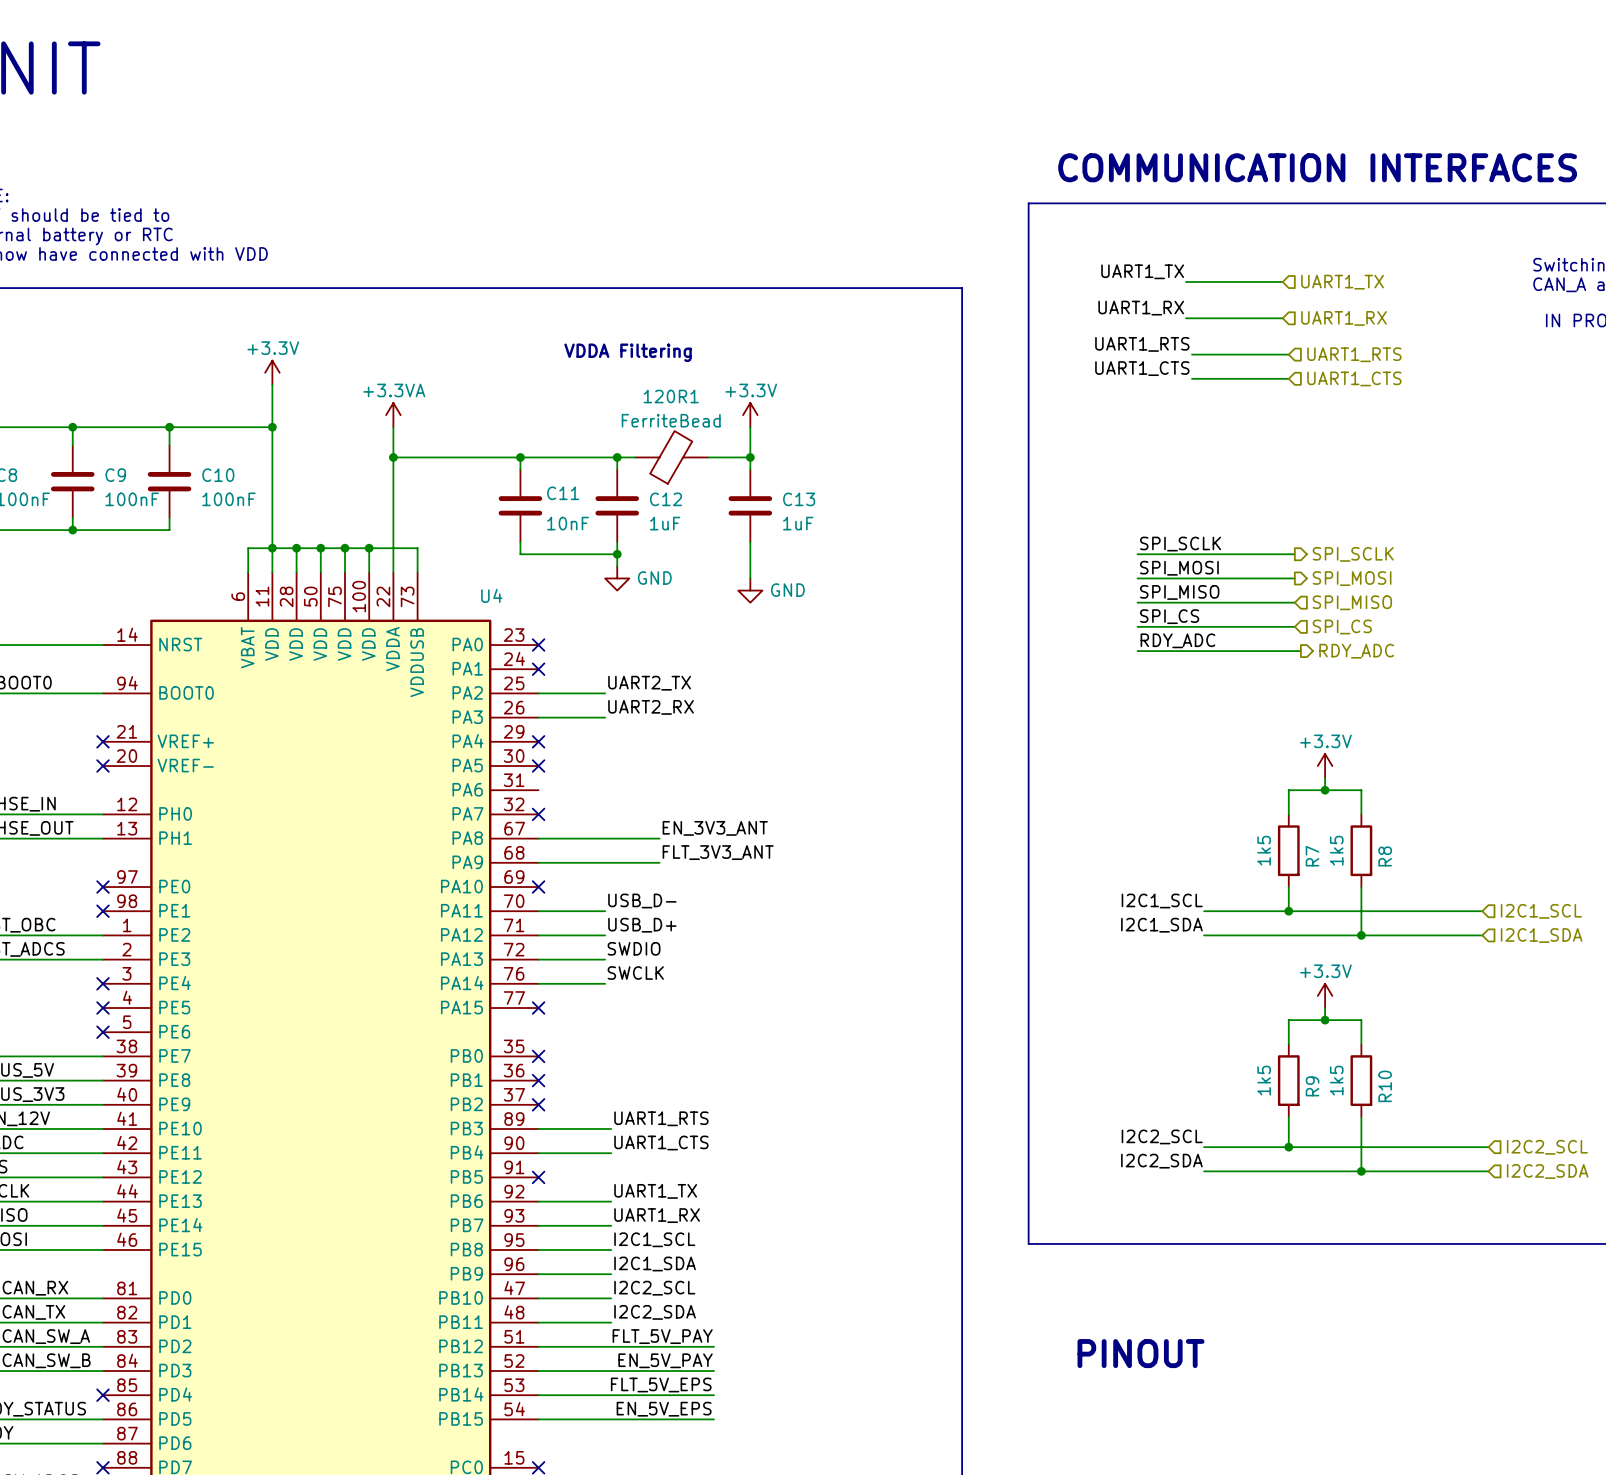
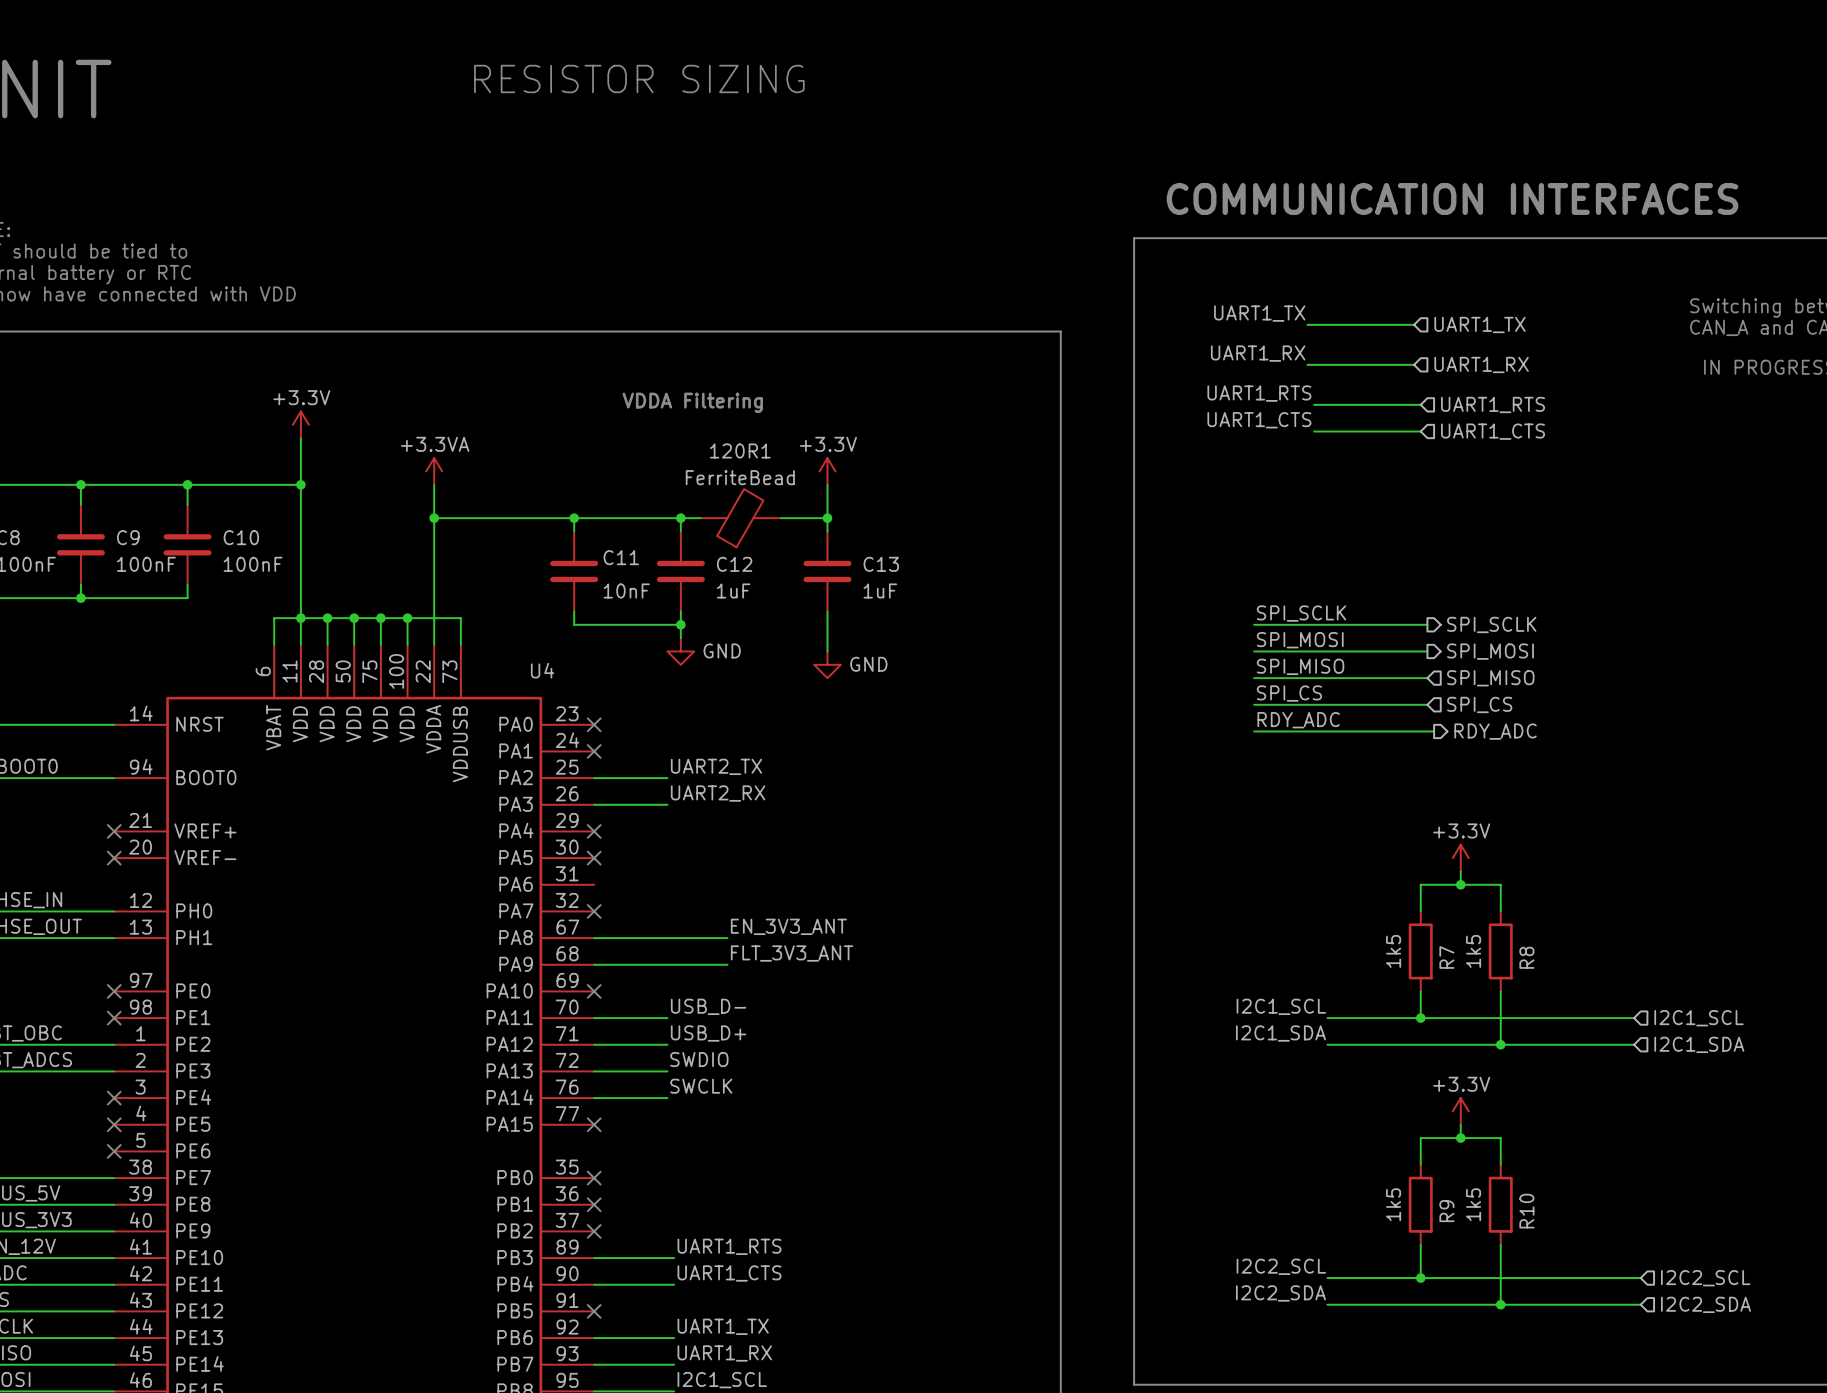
text: none -> RESISTOR SIZING (639, 78)

